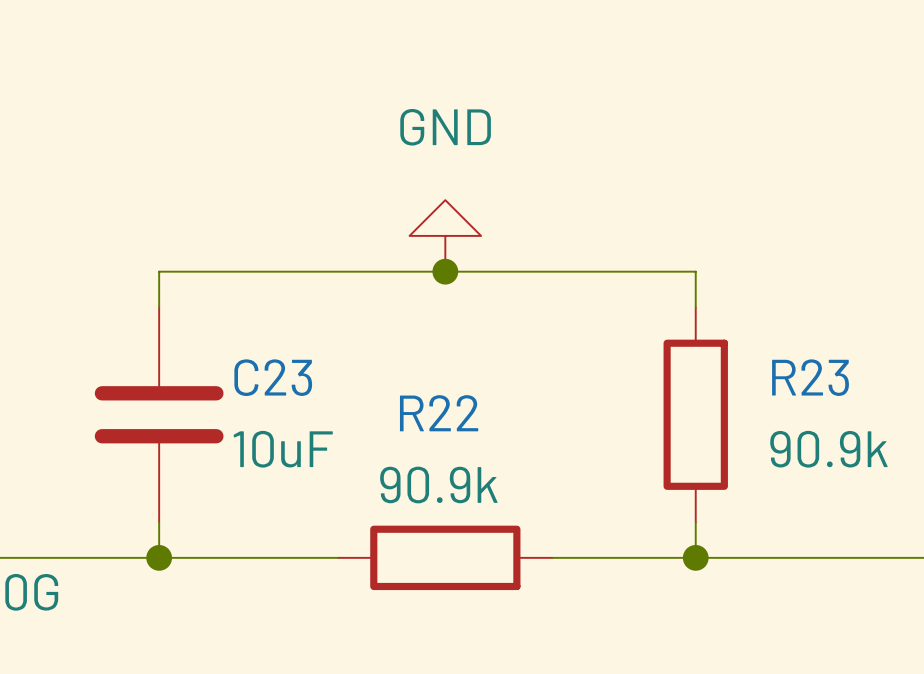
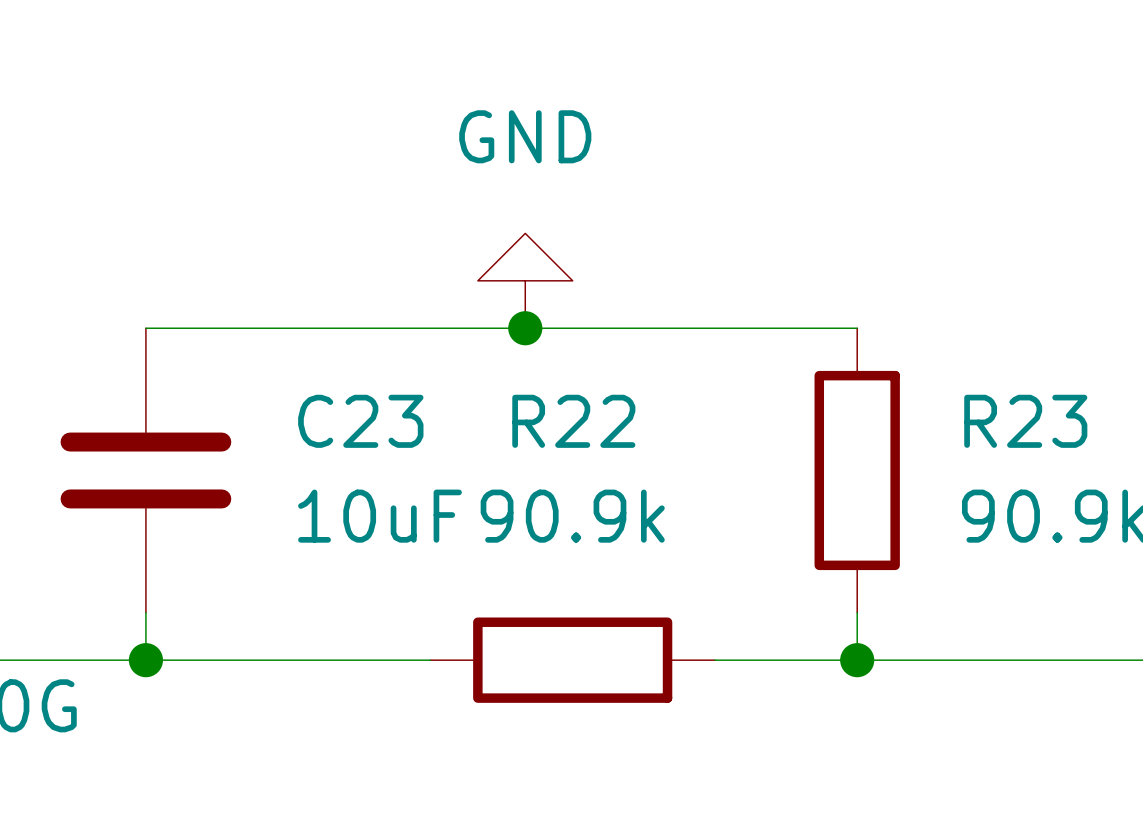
power symbol position: GND (445, 235) -> GND (525, 280)
junction position: (445, 271) -> (525, 328)
wire: (159, 307) (159, 271) (695, 271) (695, 307) -> (145, 328) (857, 328)
C23 name position: C23 (273, 377) -> C23 (360, 421)
R22 name position: R22 (439, 413) -> R22 (573, 421)
C23 value position: 10uF (283, 449) -> 10uF (379, 516)
R22 value position: 90.9k (438, 485) -> 90.9k (572, 516)
R22 position: (445, 557) -> (572, 660)

